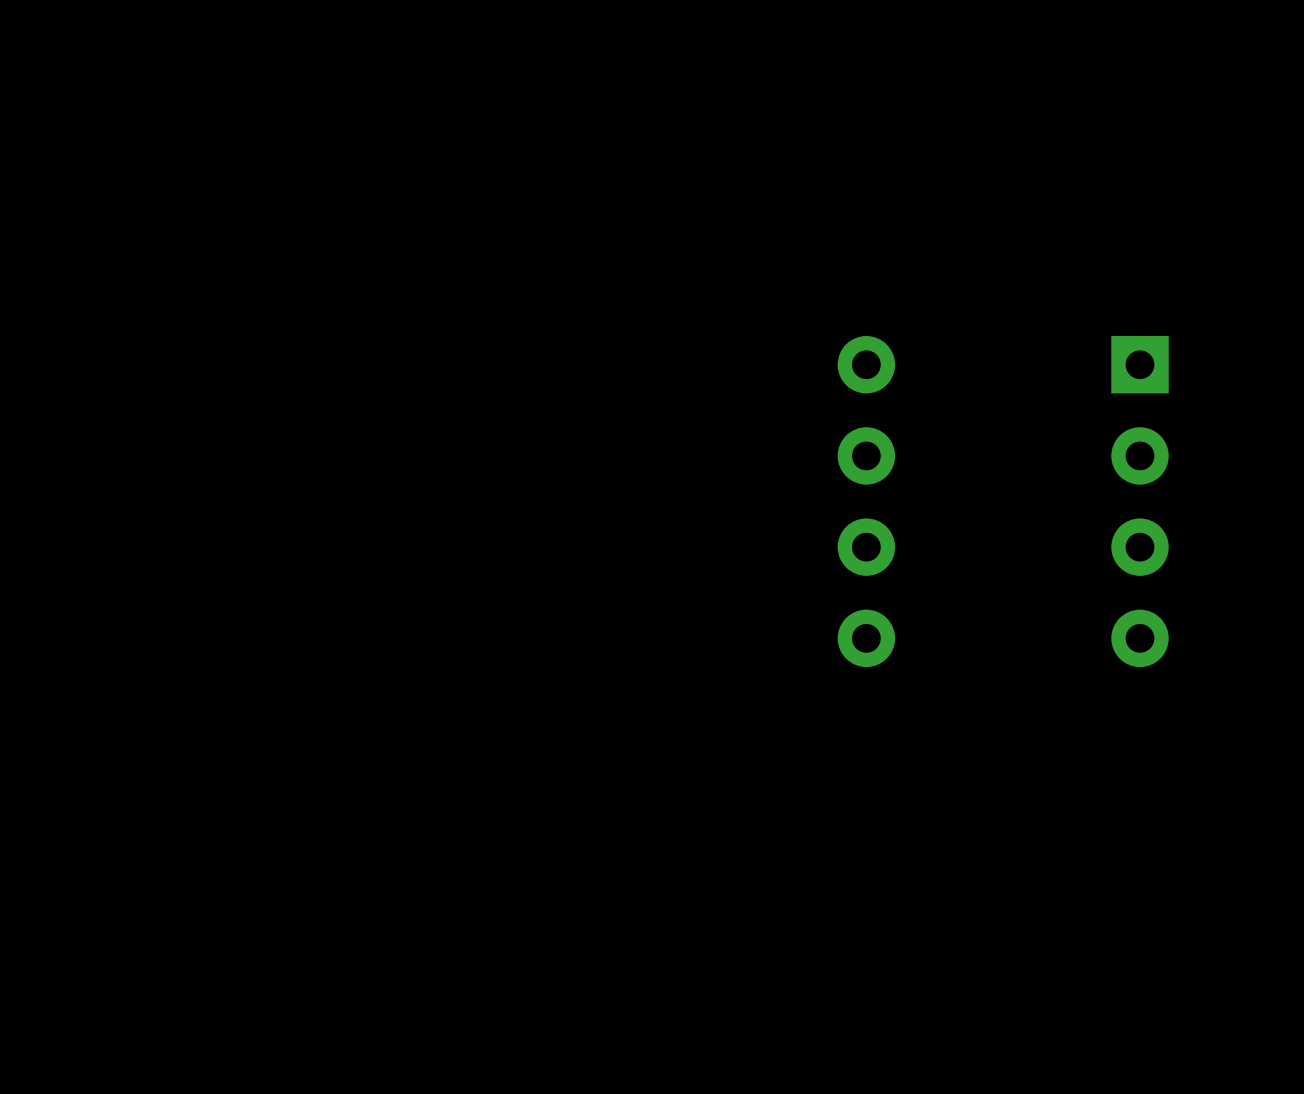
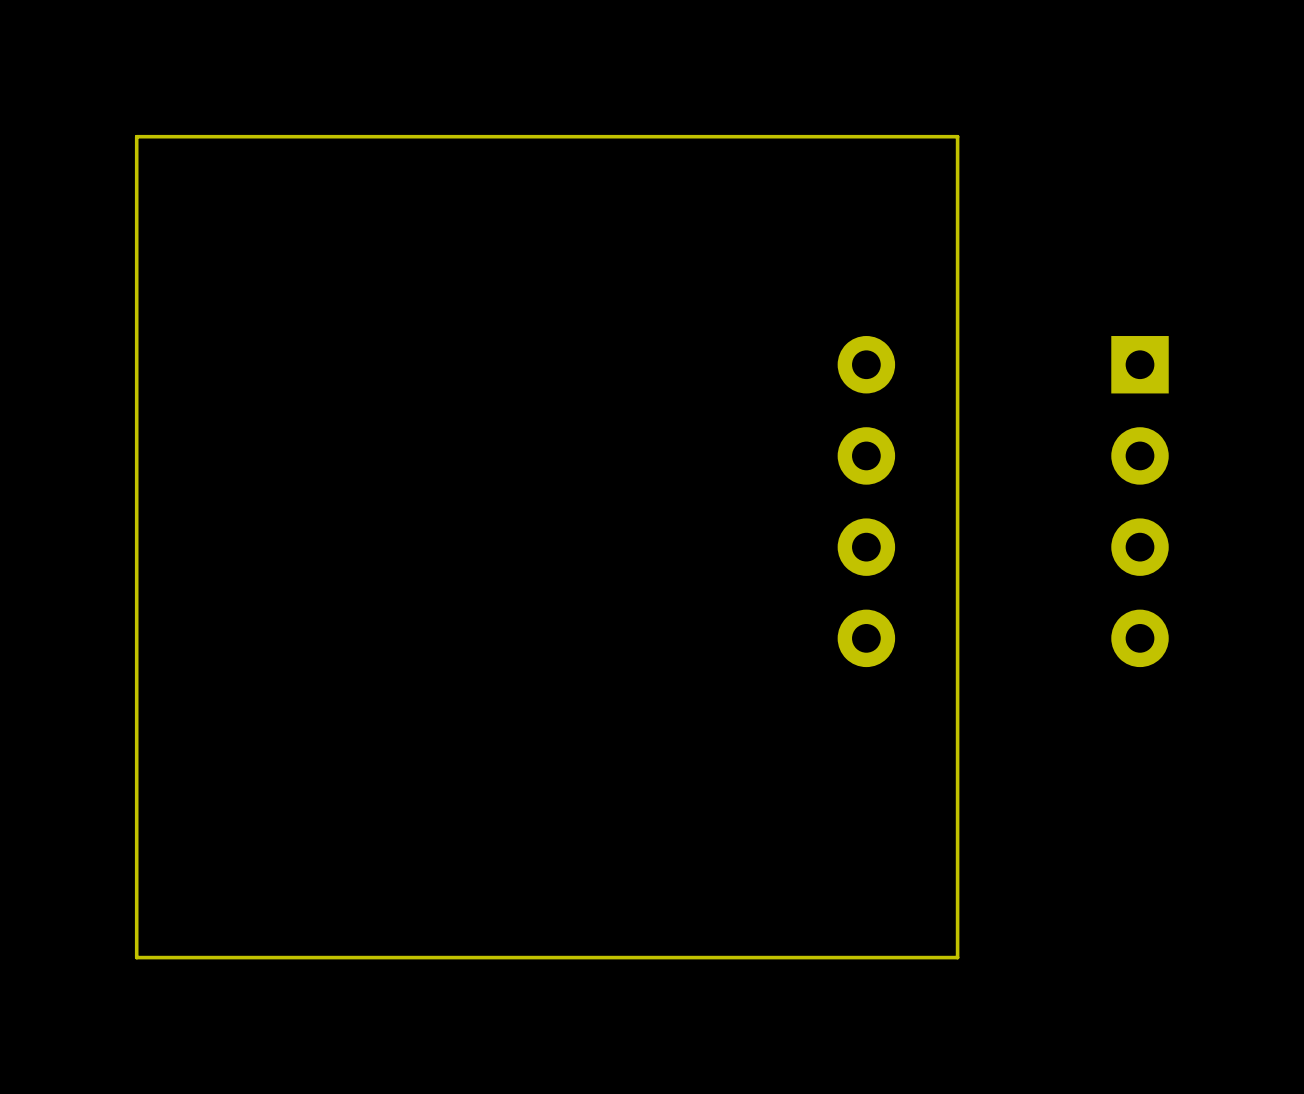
board edge: none -> (957, 136) (136, 136) (136, 957) (957, 957) (957, 136)

